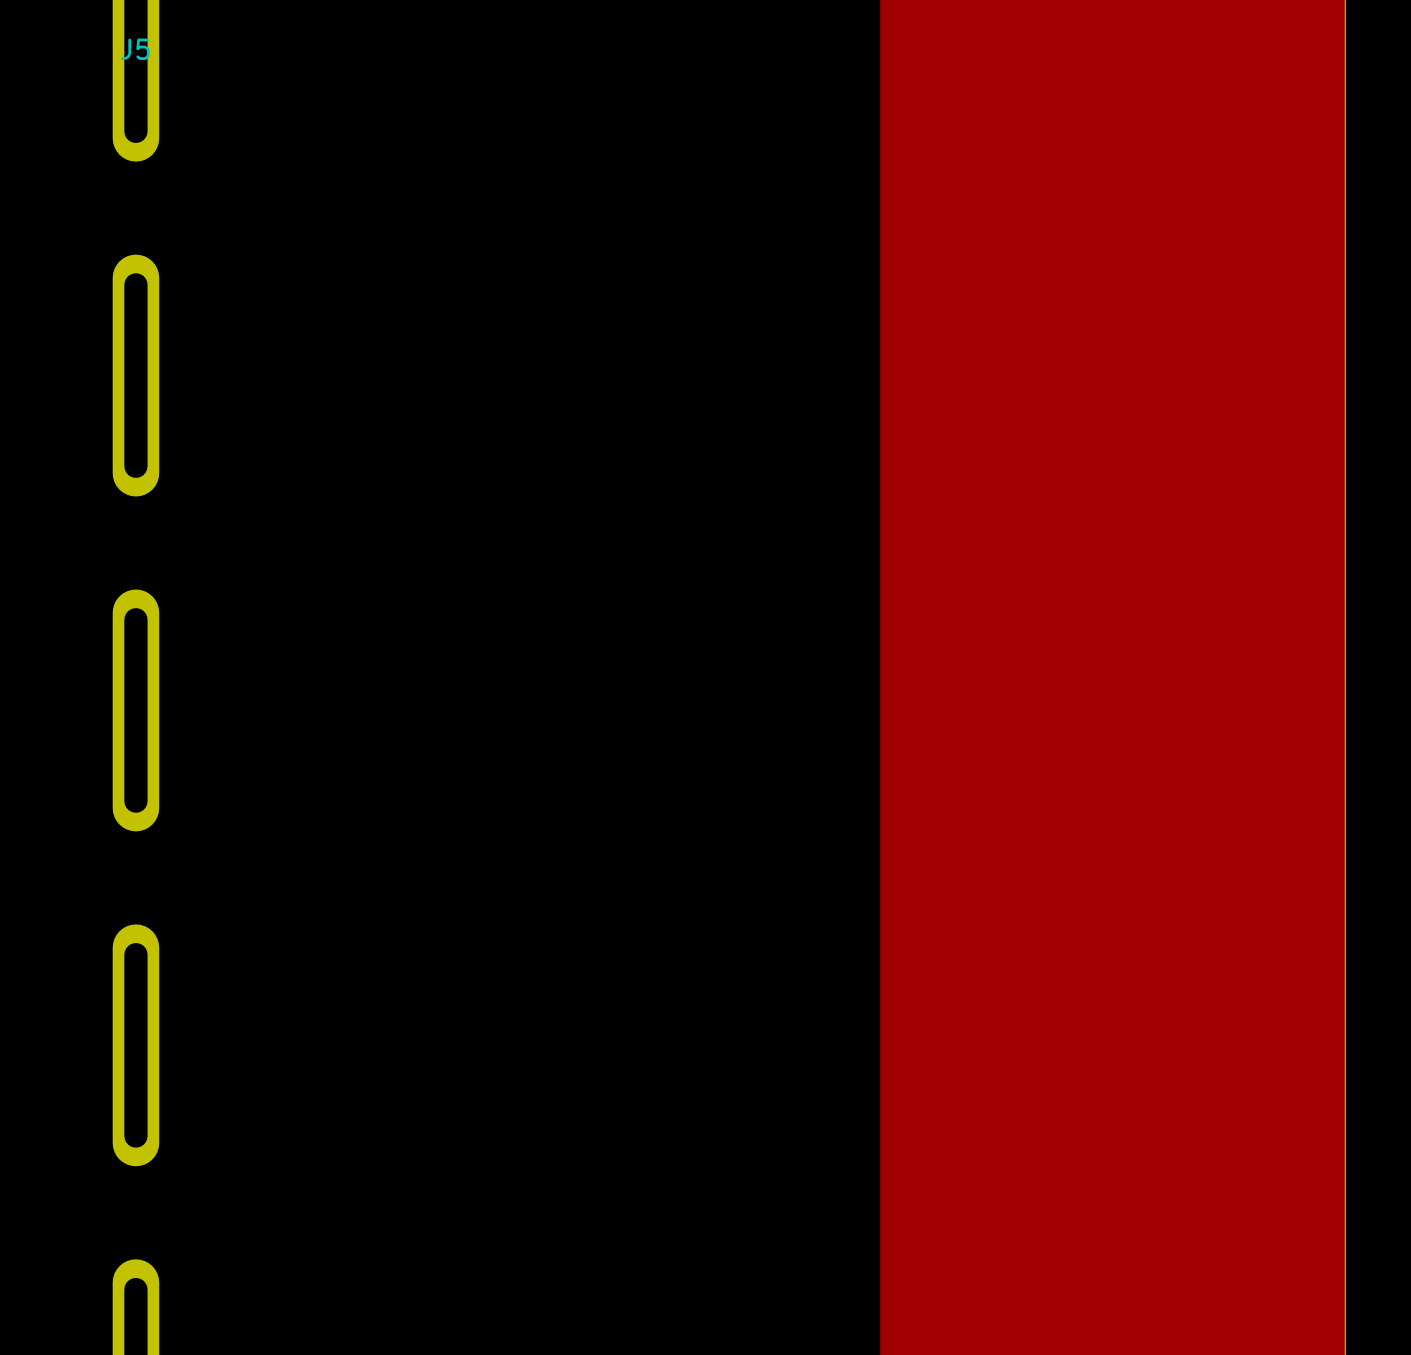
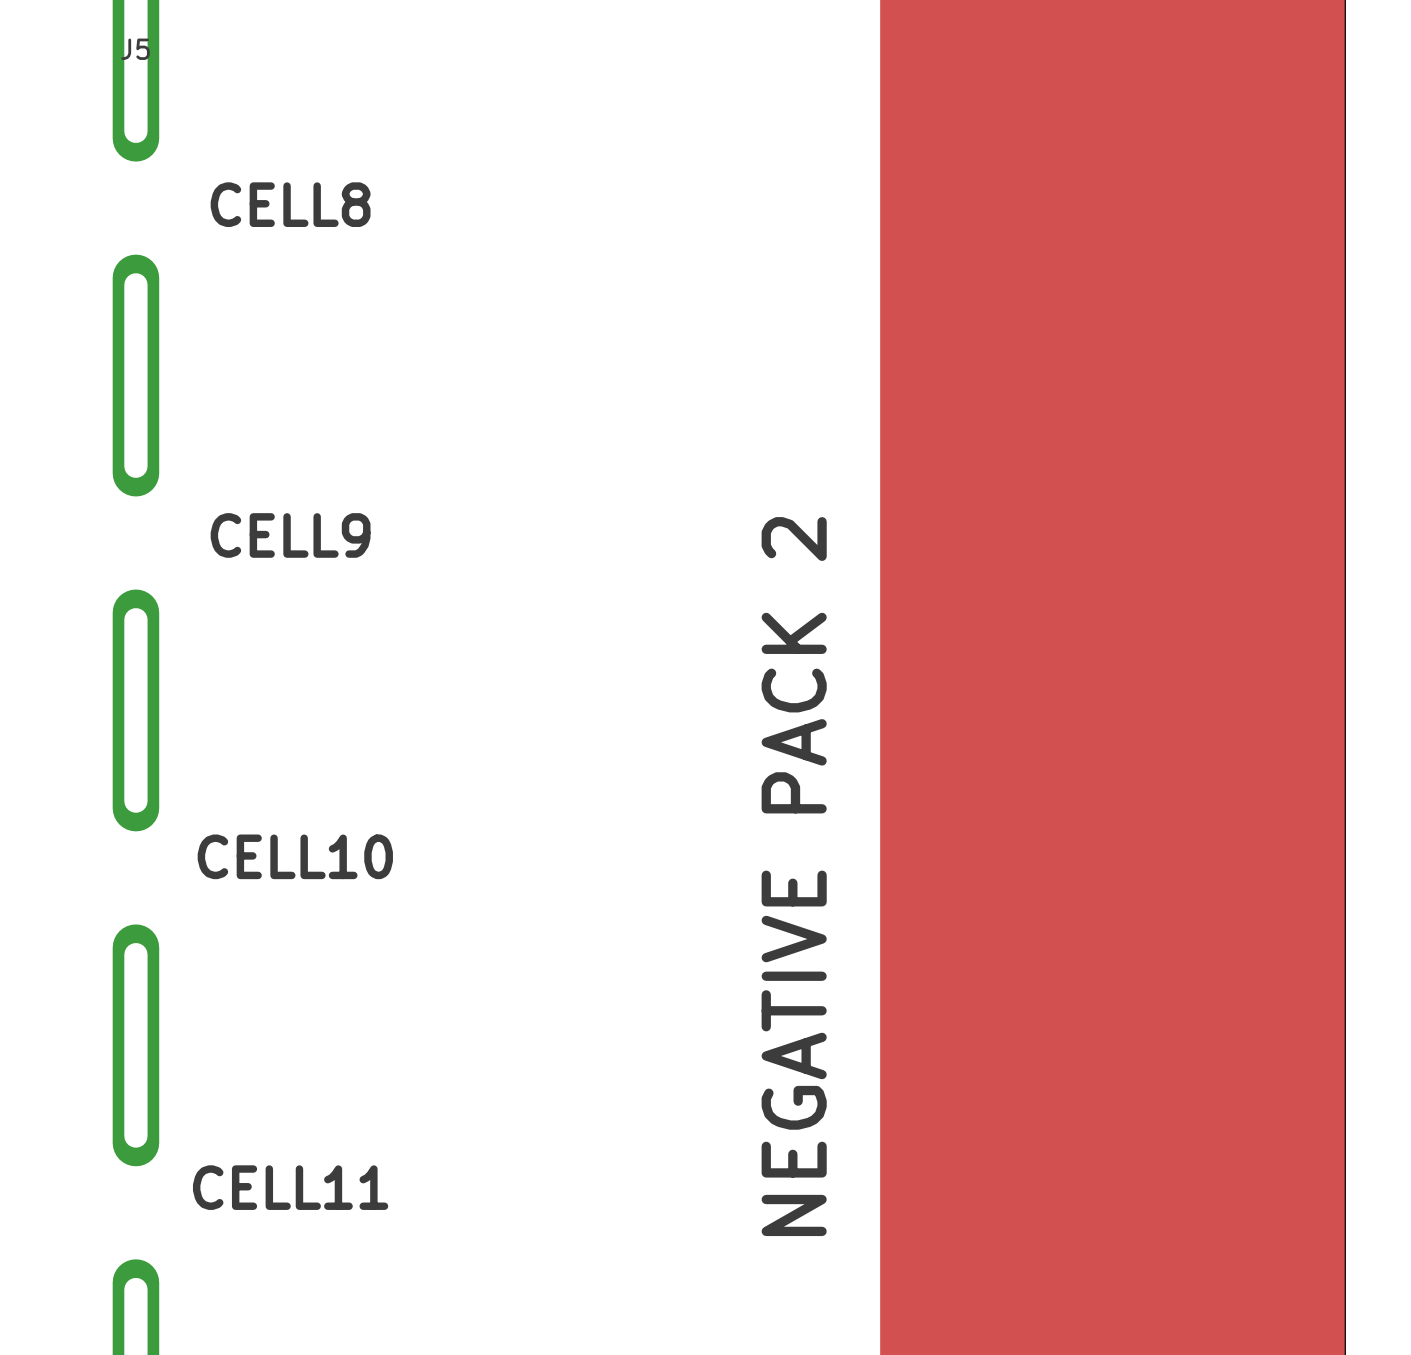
text: none -> CELL8 (290, 204)
text: none -> CELL9 (290, 535)
text: none -> CELL10 (295, 856)
text: none -> NEGATIVE PACK 2 (794, 876)
text: none -> CELL11 (290, 1187)

